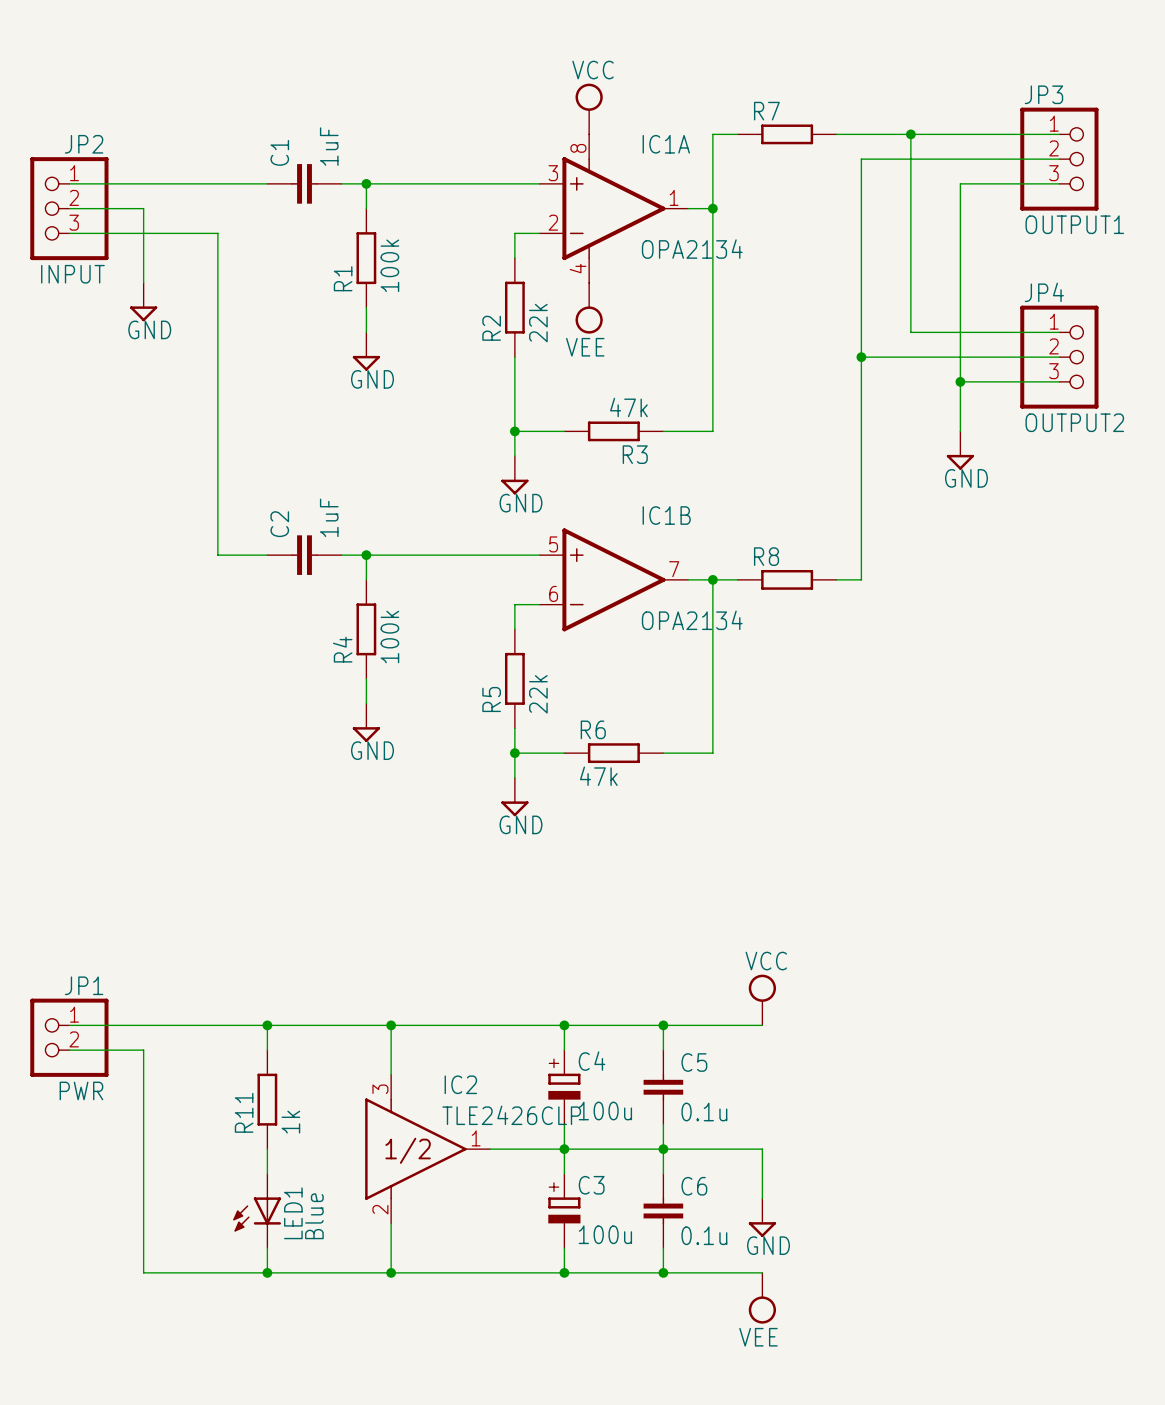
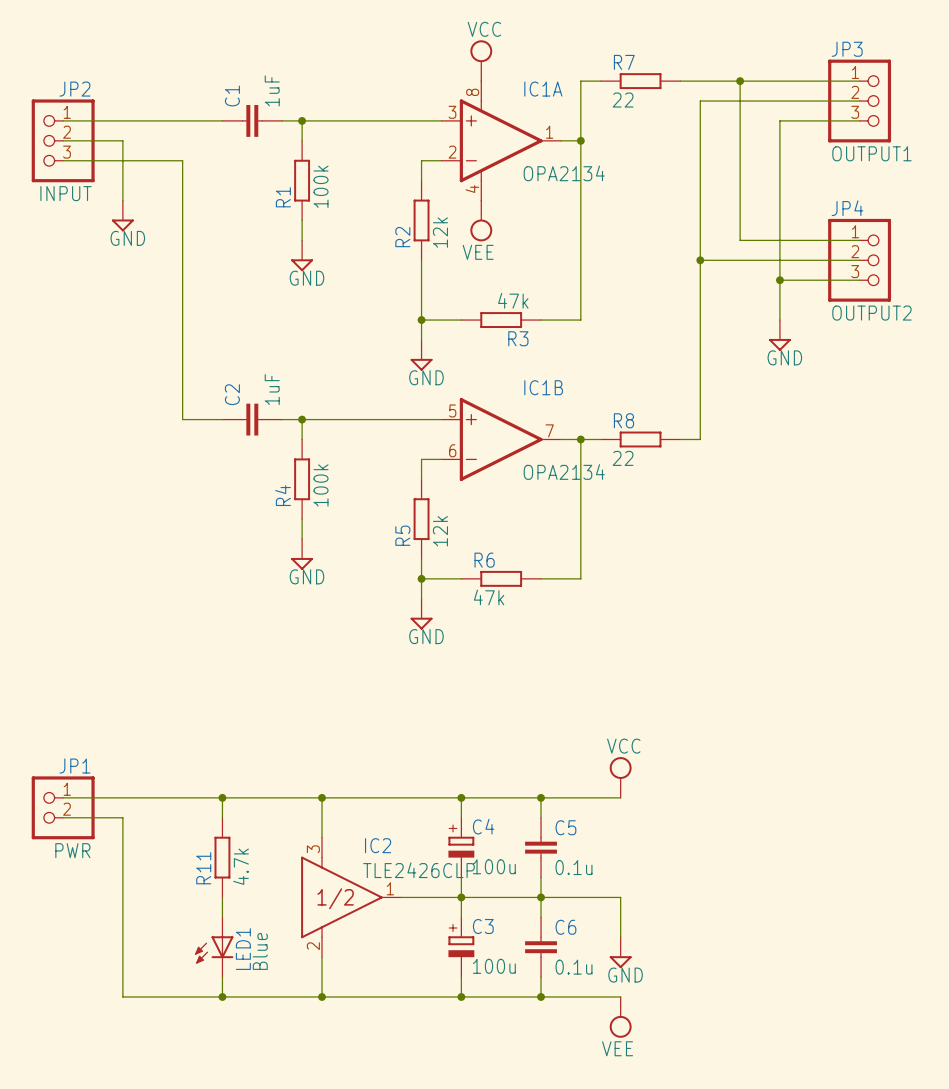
R7 value: none -> 22 (623, 100)
R2 value: 22k (538, 323) -> 12k (440, 232)
R8 value: none -> 22 (623, 458)
R5 value: 22k (538, 694) -> 12k (440, 531)
R11 value: 1k (290, 1122) -> 4.7k (241, 866)

